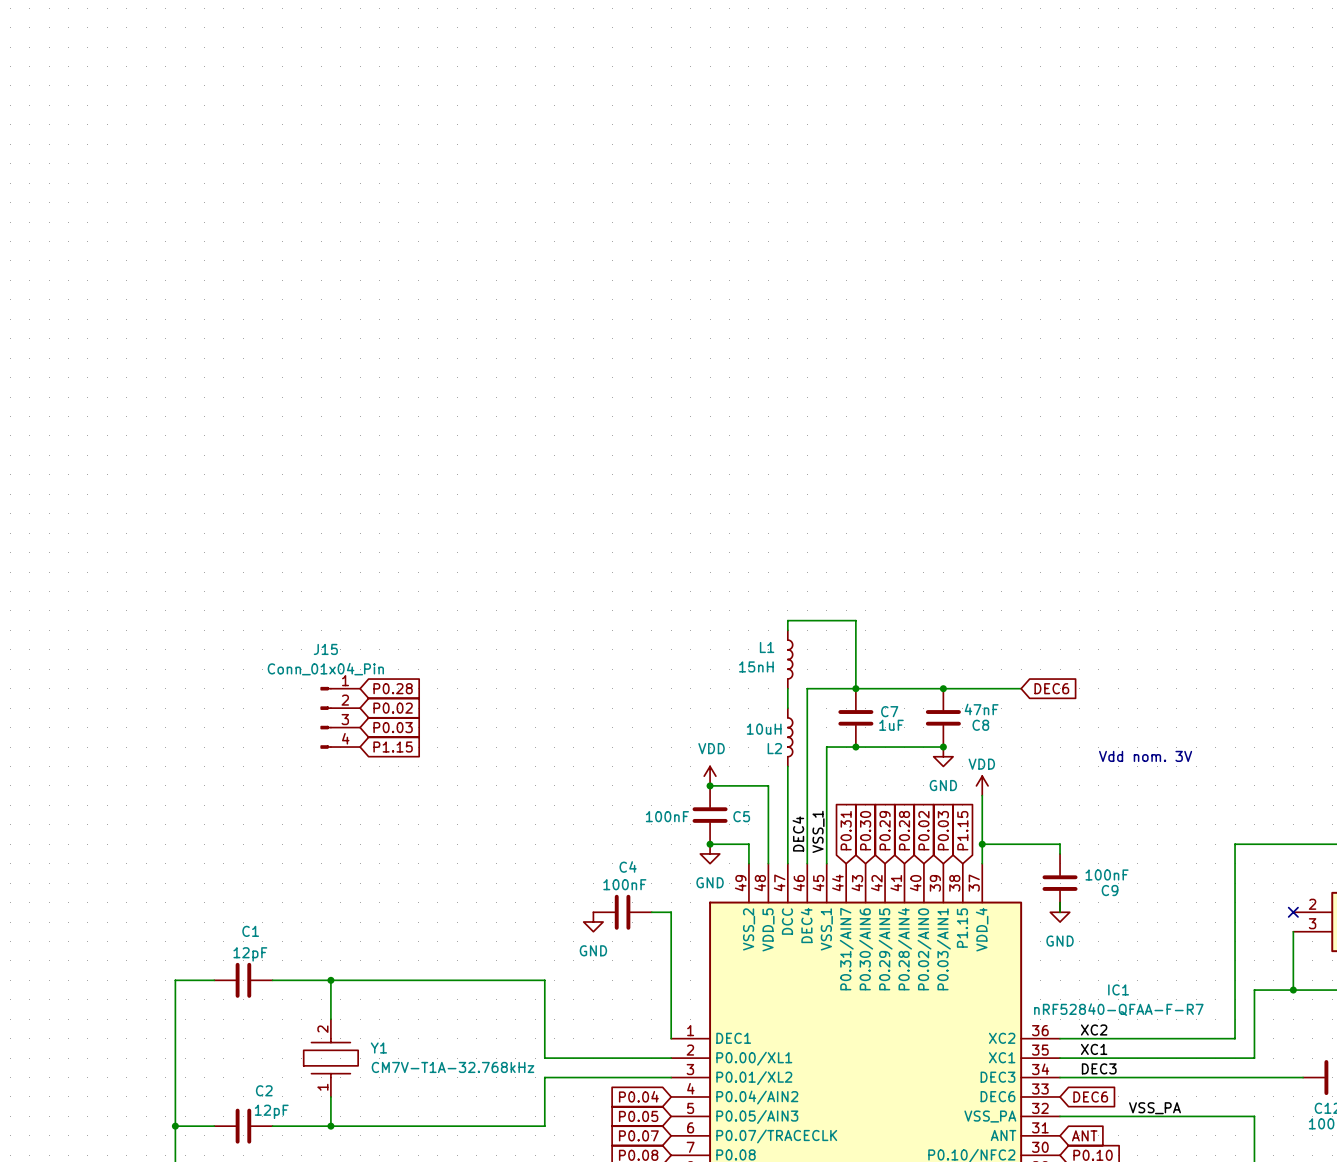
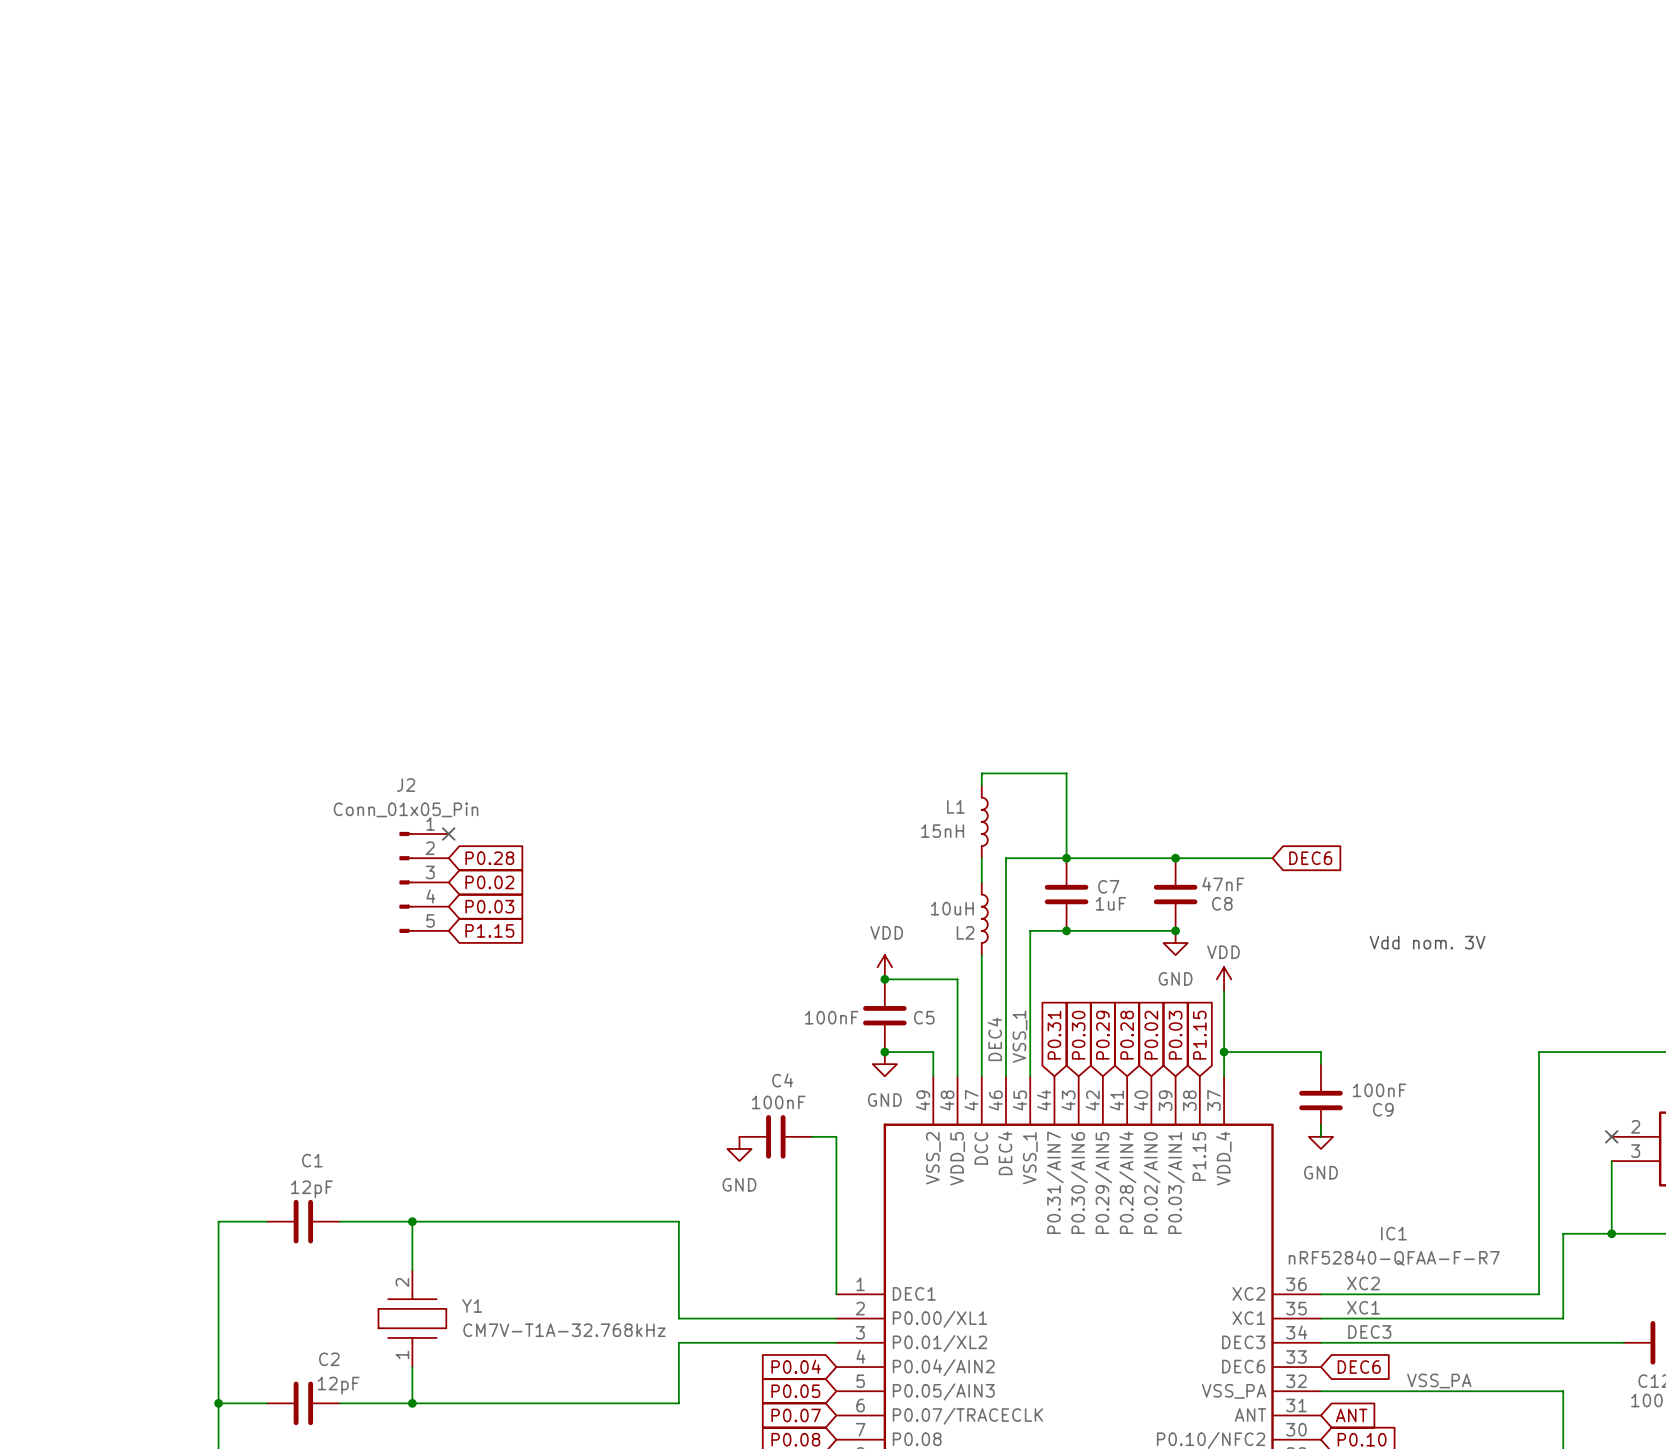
no-connect mark: none -> (448, 833)
J2: none -> Conn_01x05_Pin (424, 882)
J15: Conn_01x04_Pin (340, 717) -> none

